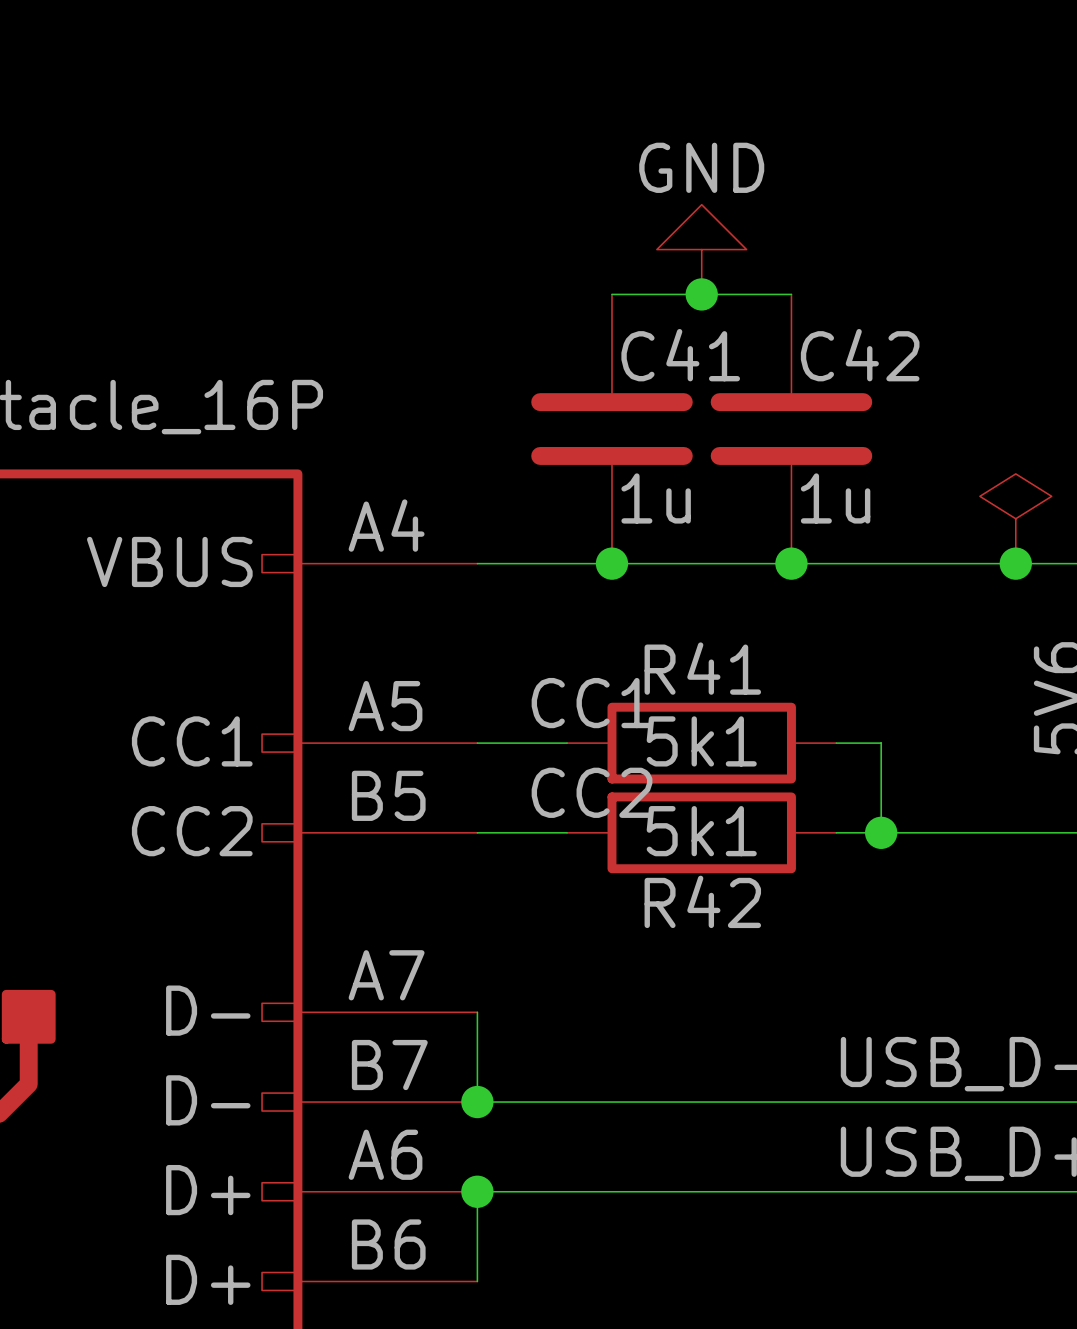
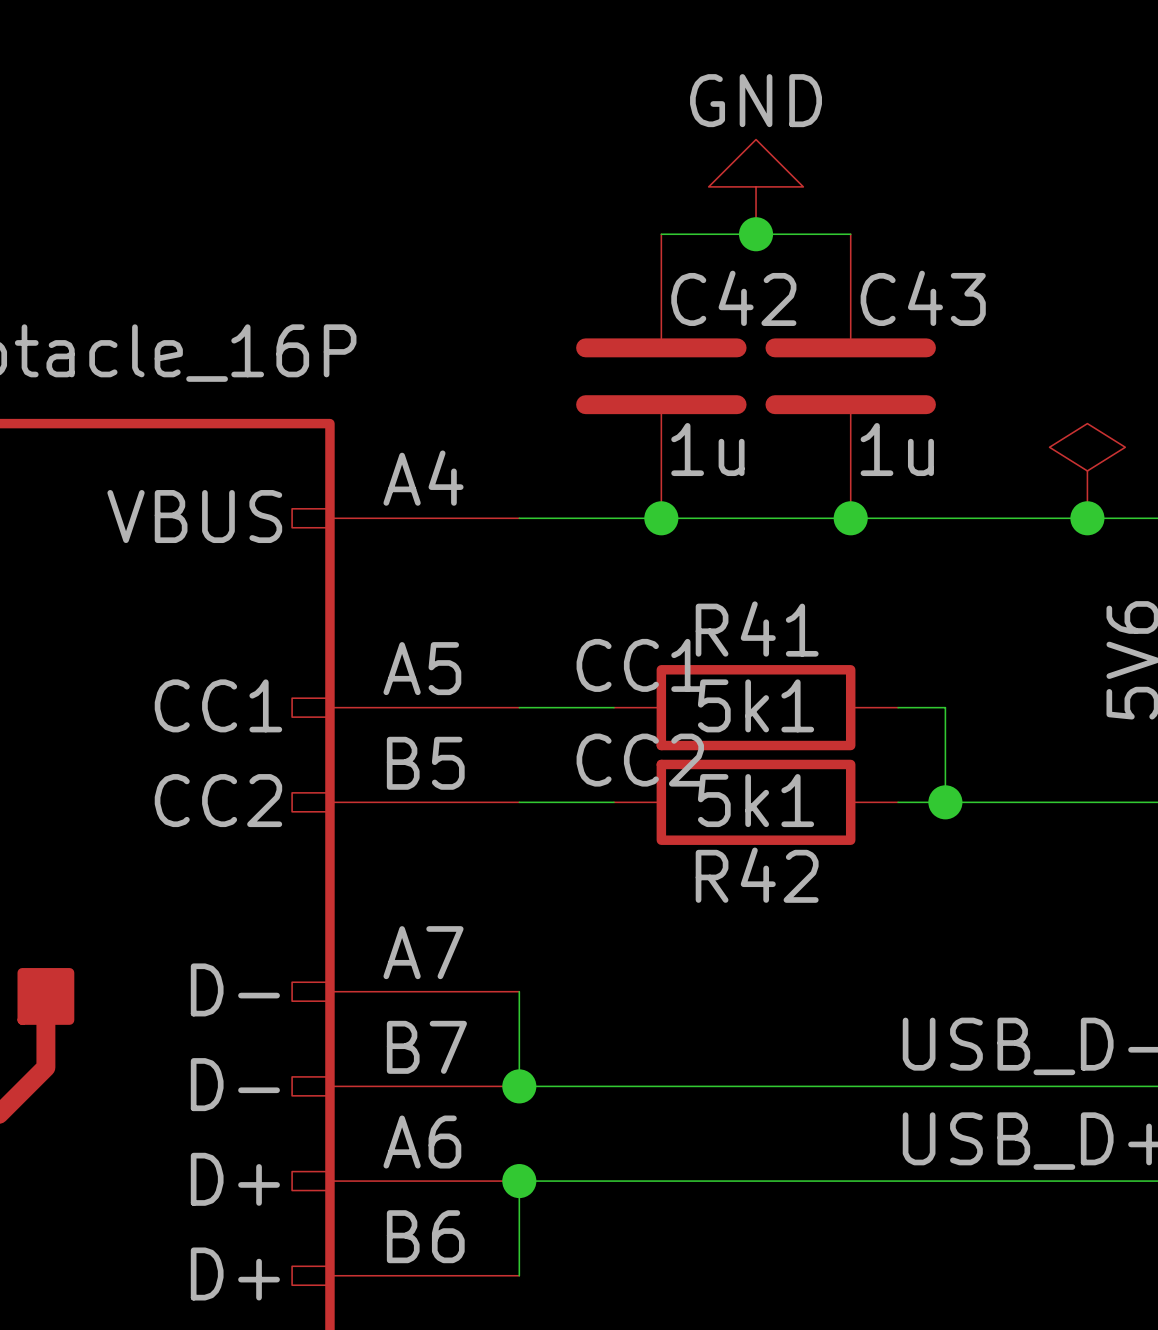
C41 name: C41 (680, 355) -> C42 (733, 298)
C42 name: C42 (860, 355) -> C43 (923, 298)

